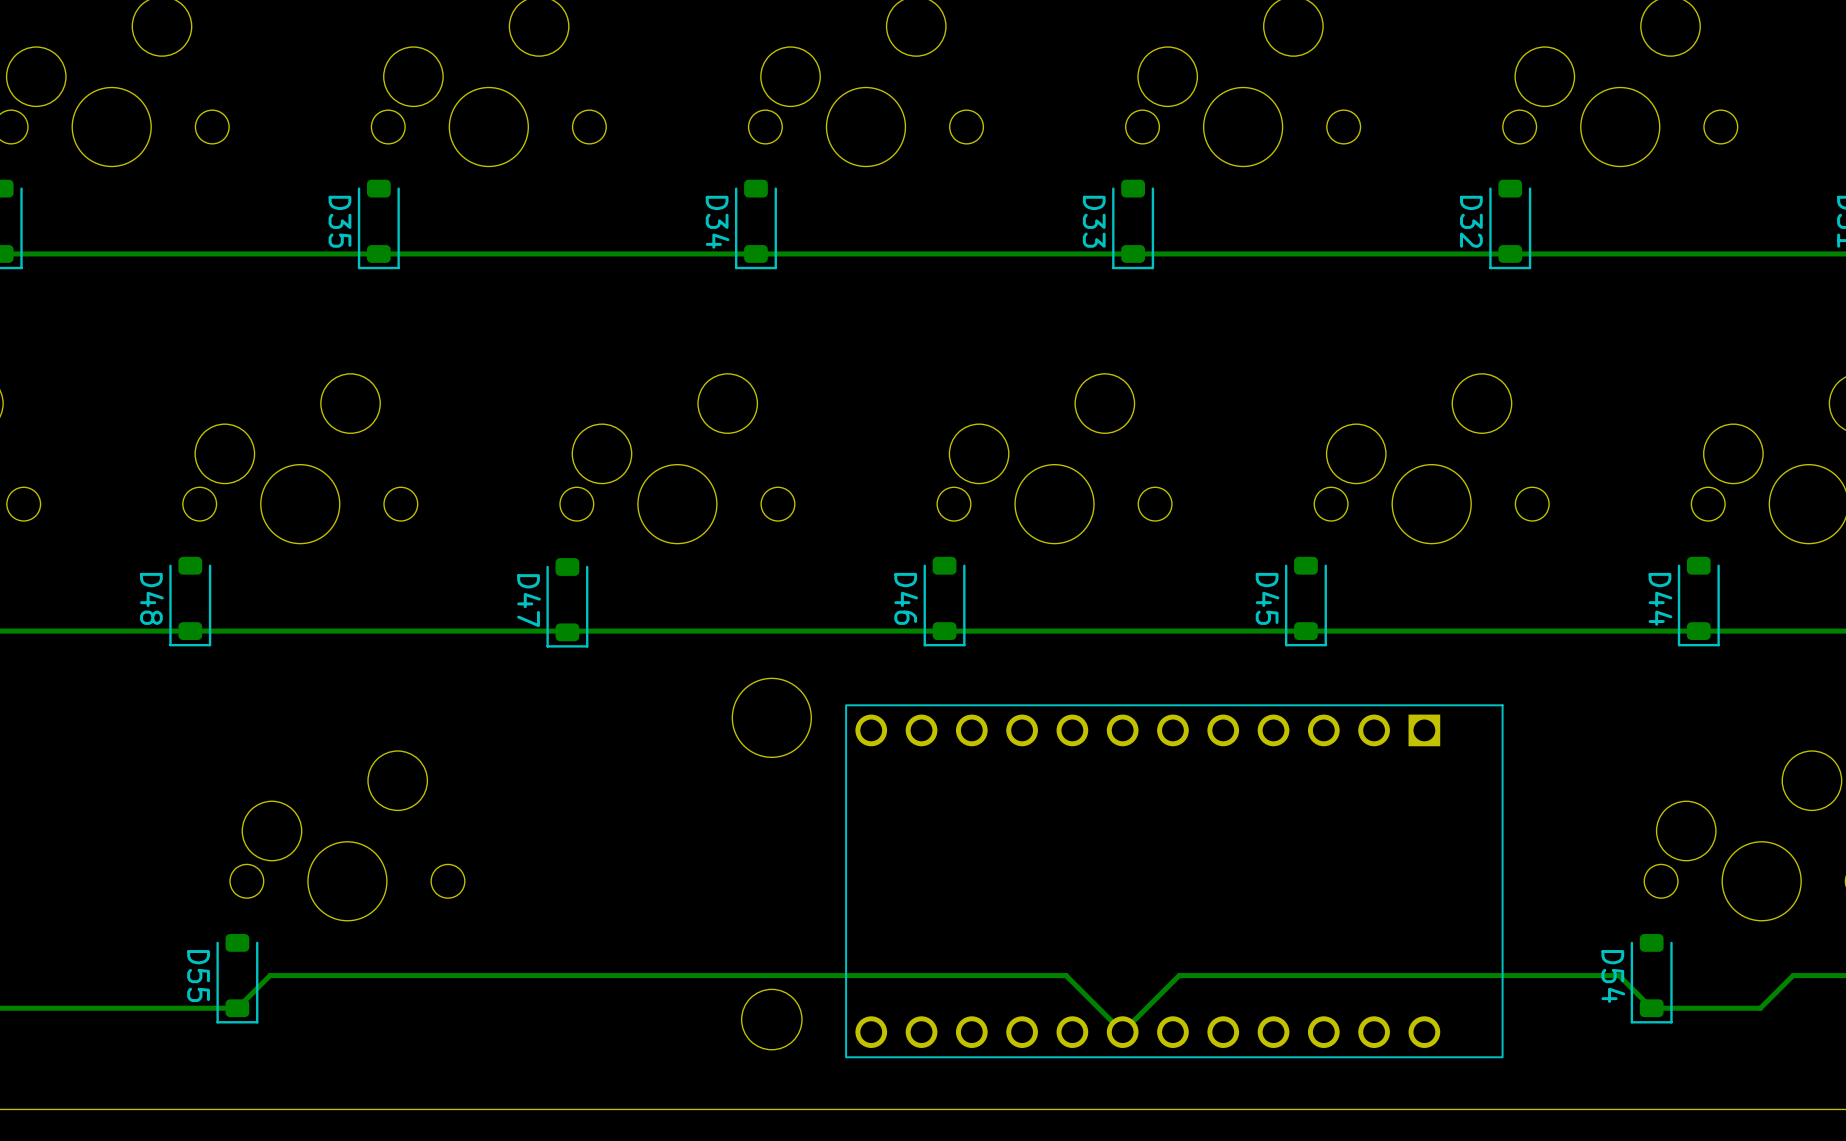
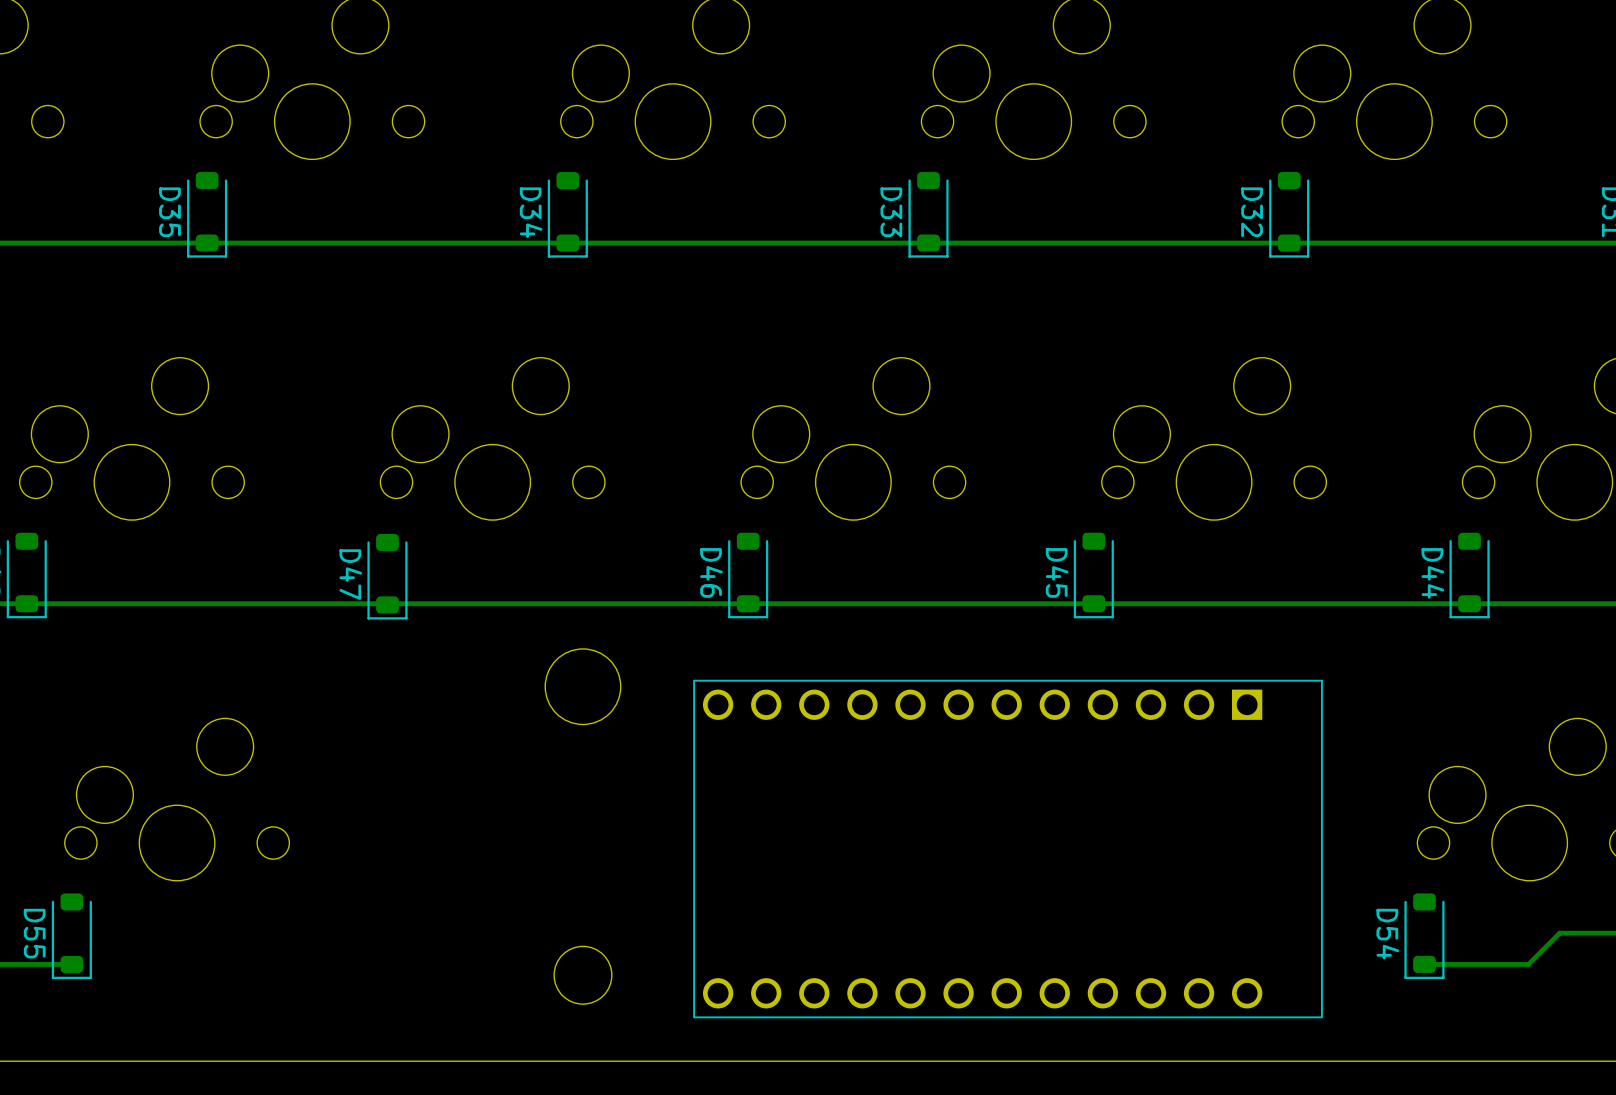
part position: (1174, 881) -> (1008, 849)
track: (1651, 1008) (1619, 975) (1179, 975) (1122, 1032) (1066, 975) (270, 975) (237, 1008) -> none

